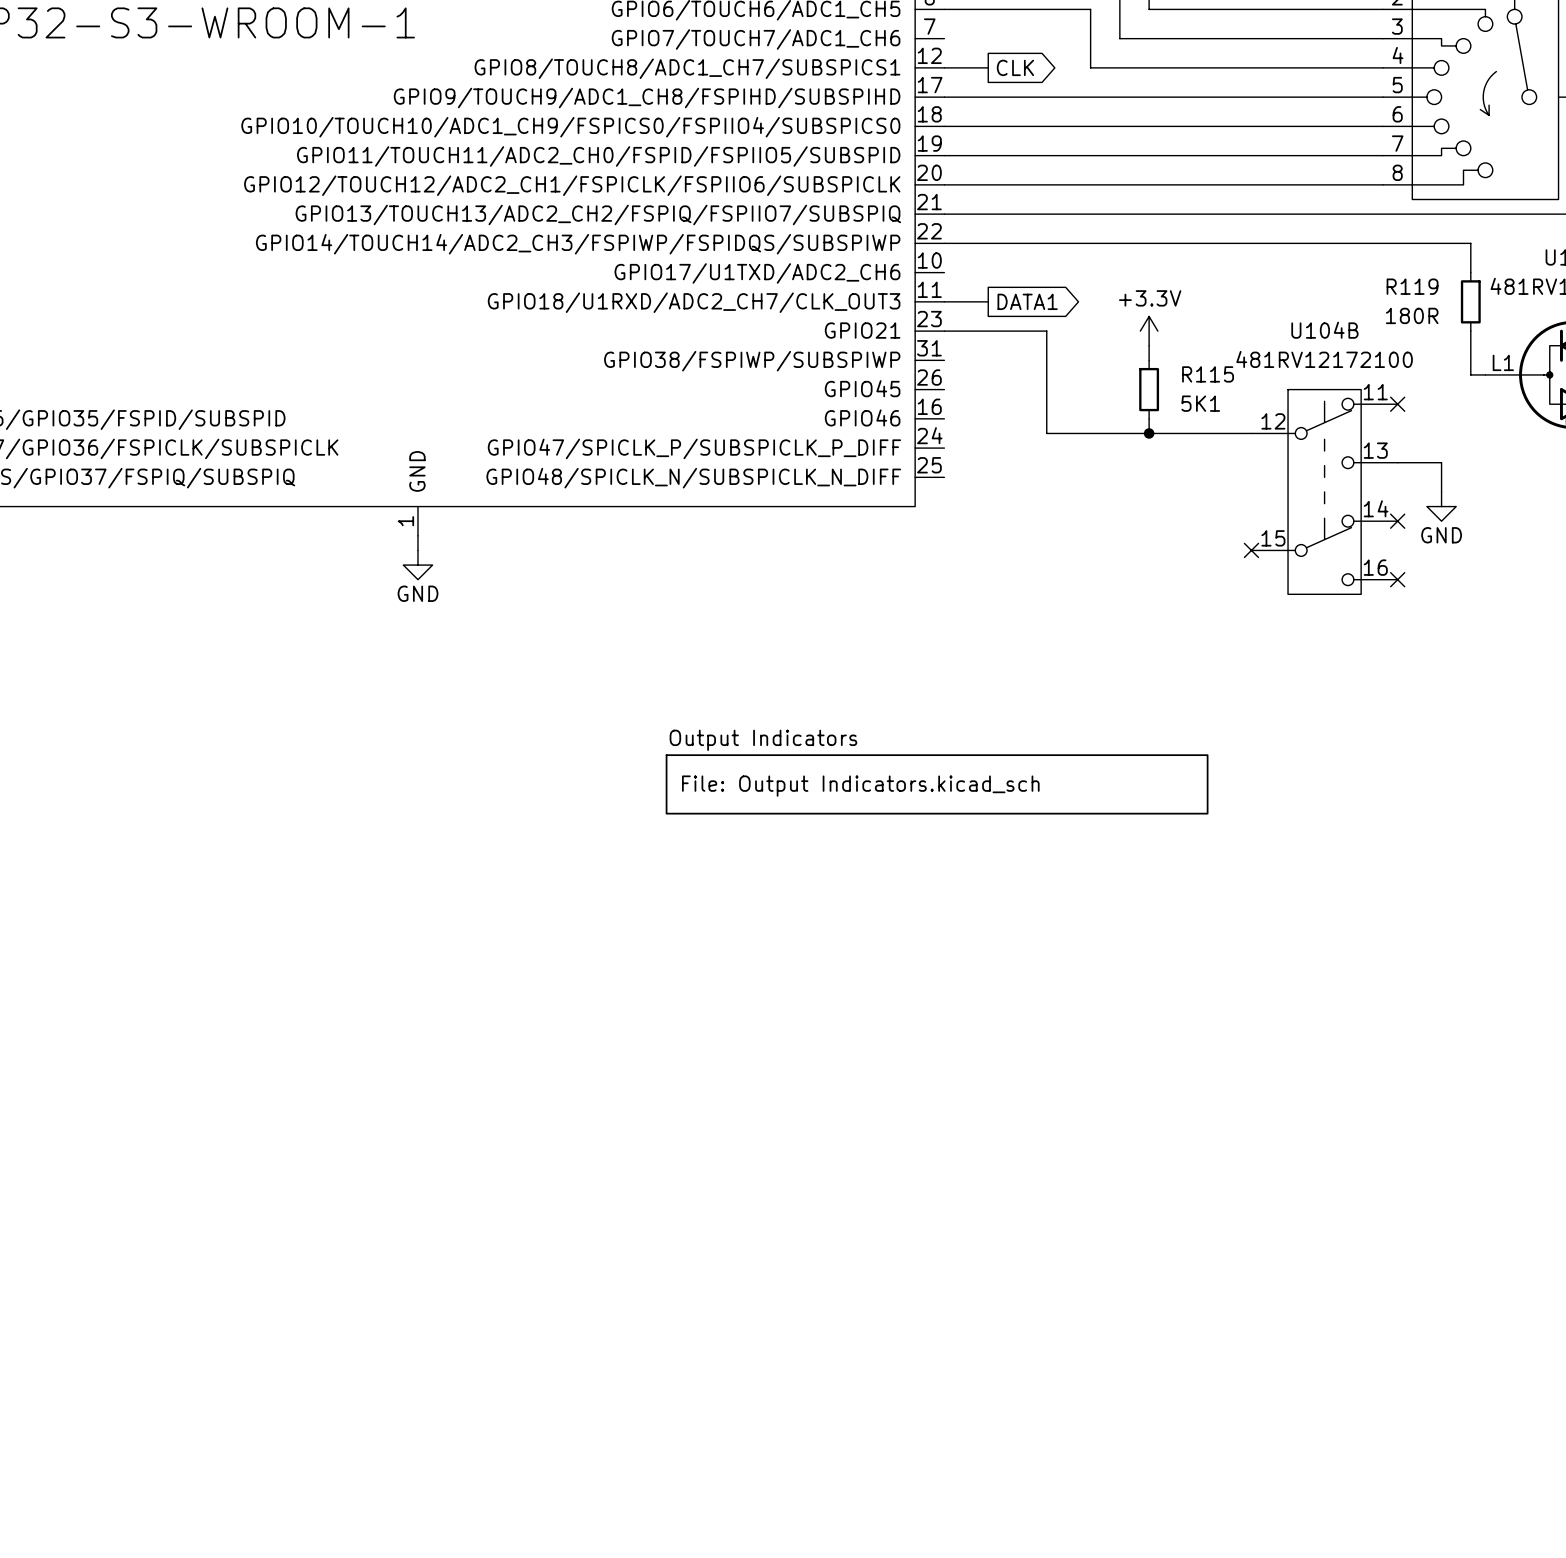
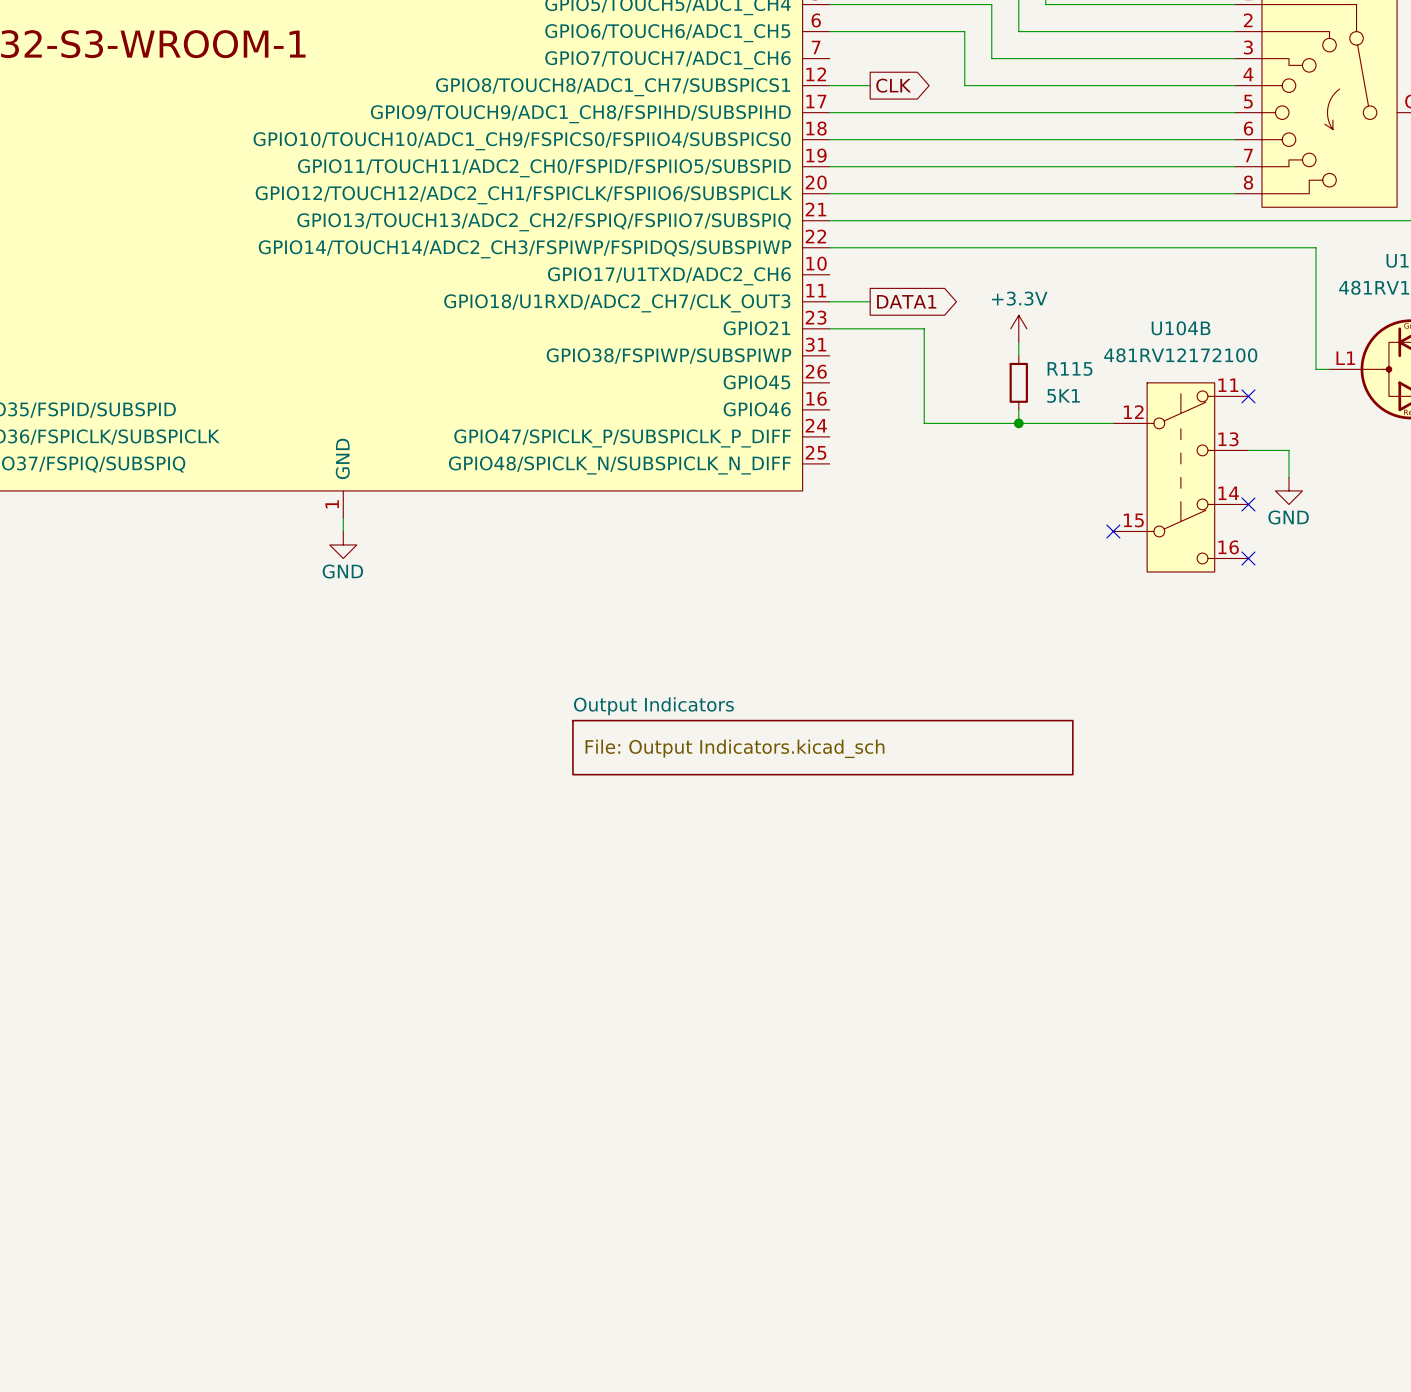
wire: none -> (1316, 274) (1316, 328)
R119: 180R (1470, 301) -> none

